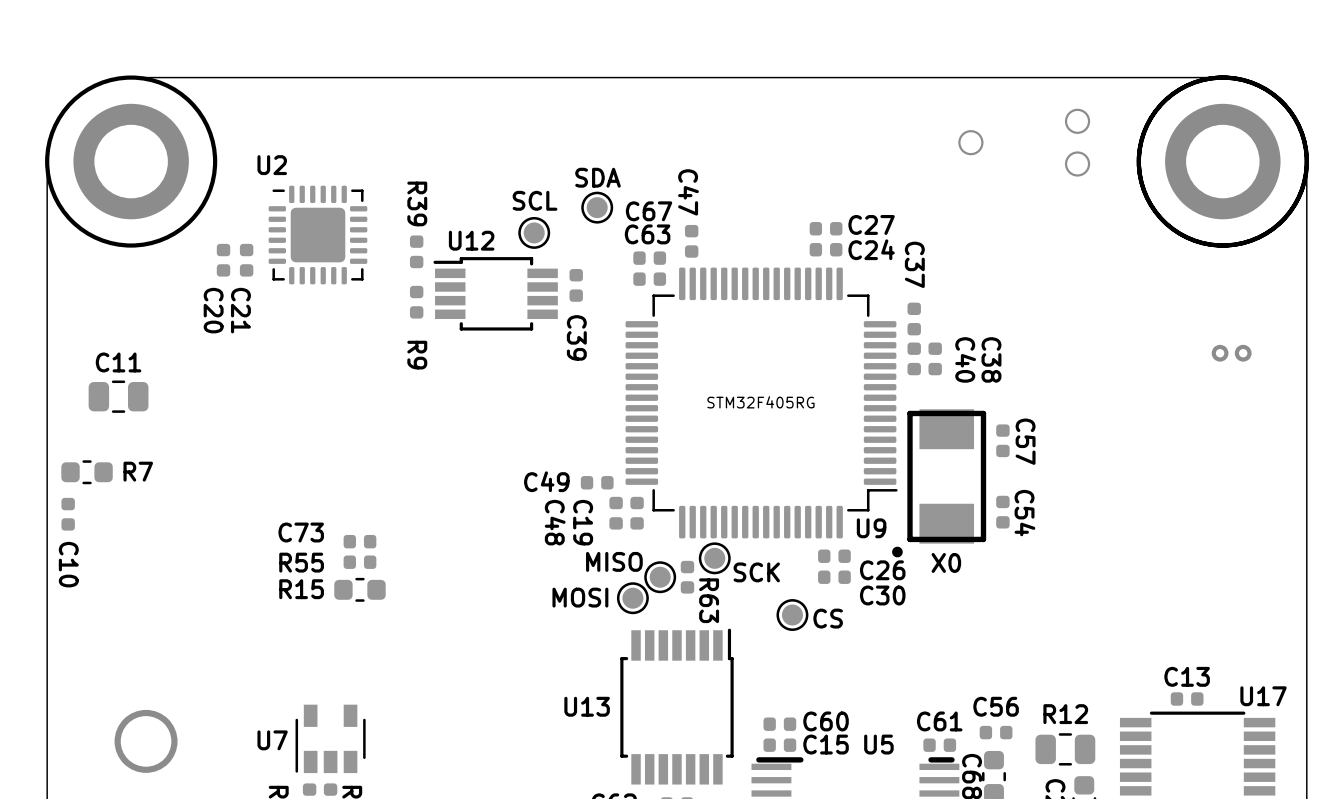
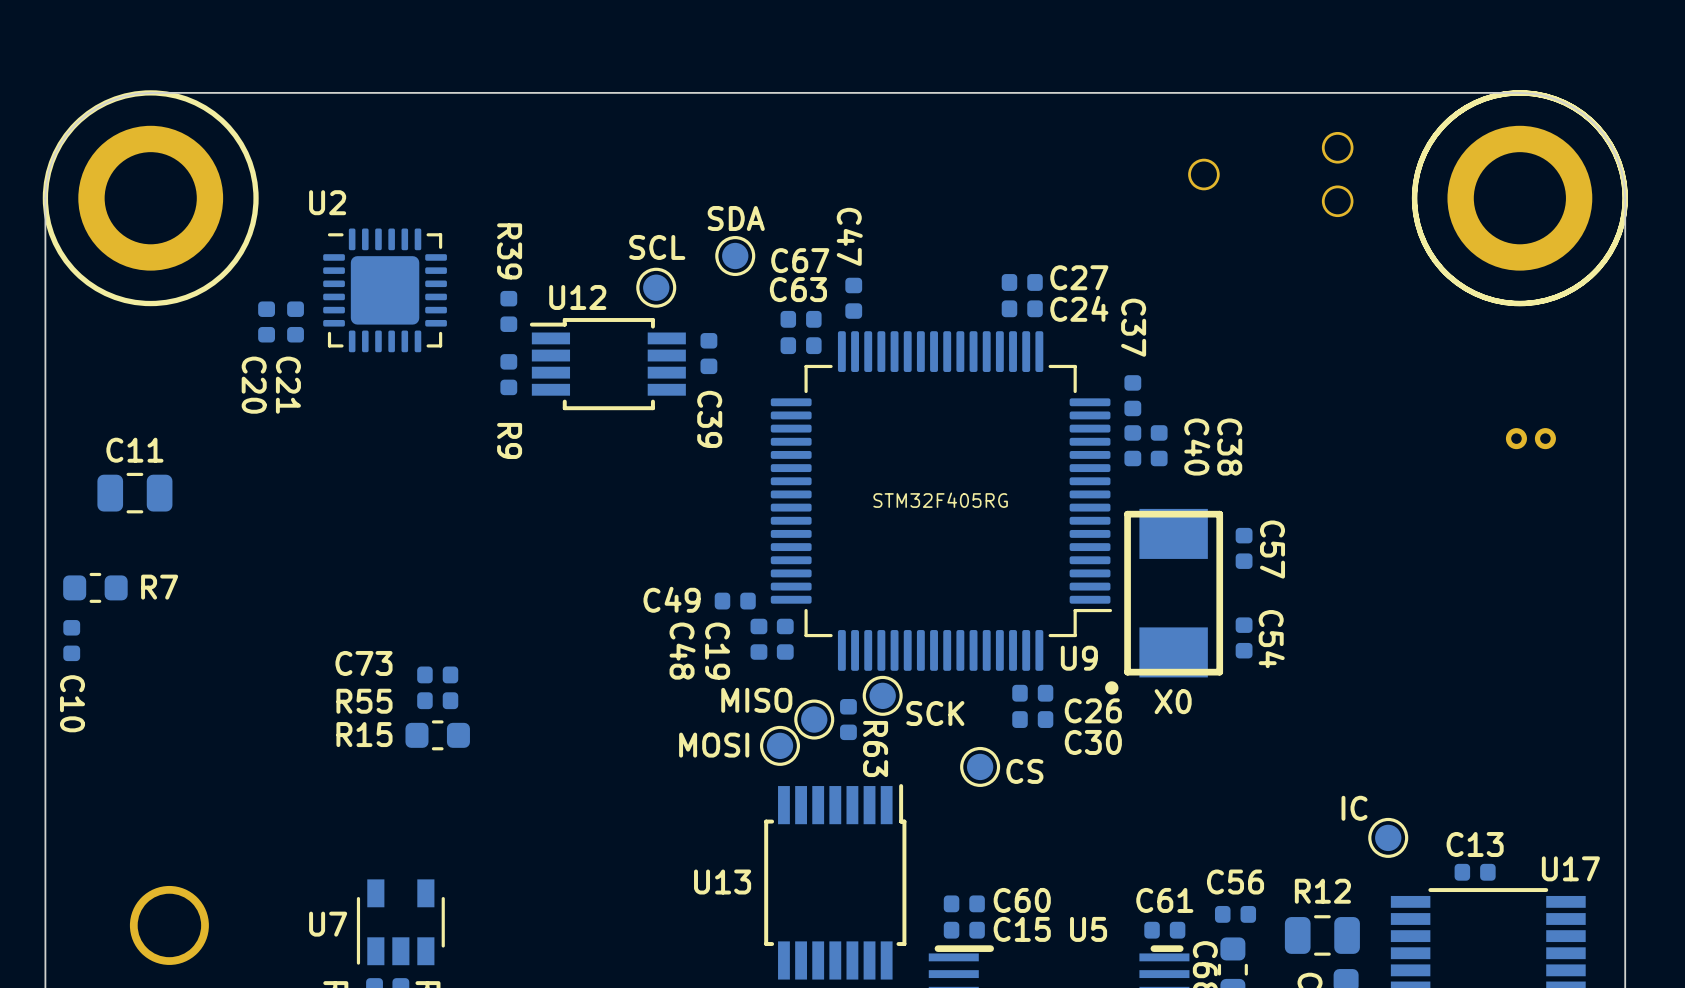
text: none -> IC (1354, 808)
part: none -> (1388, 837)

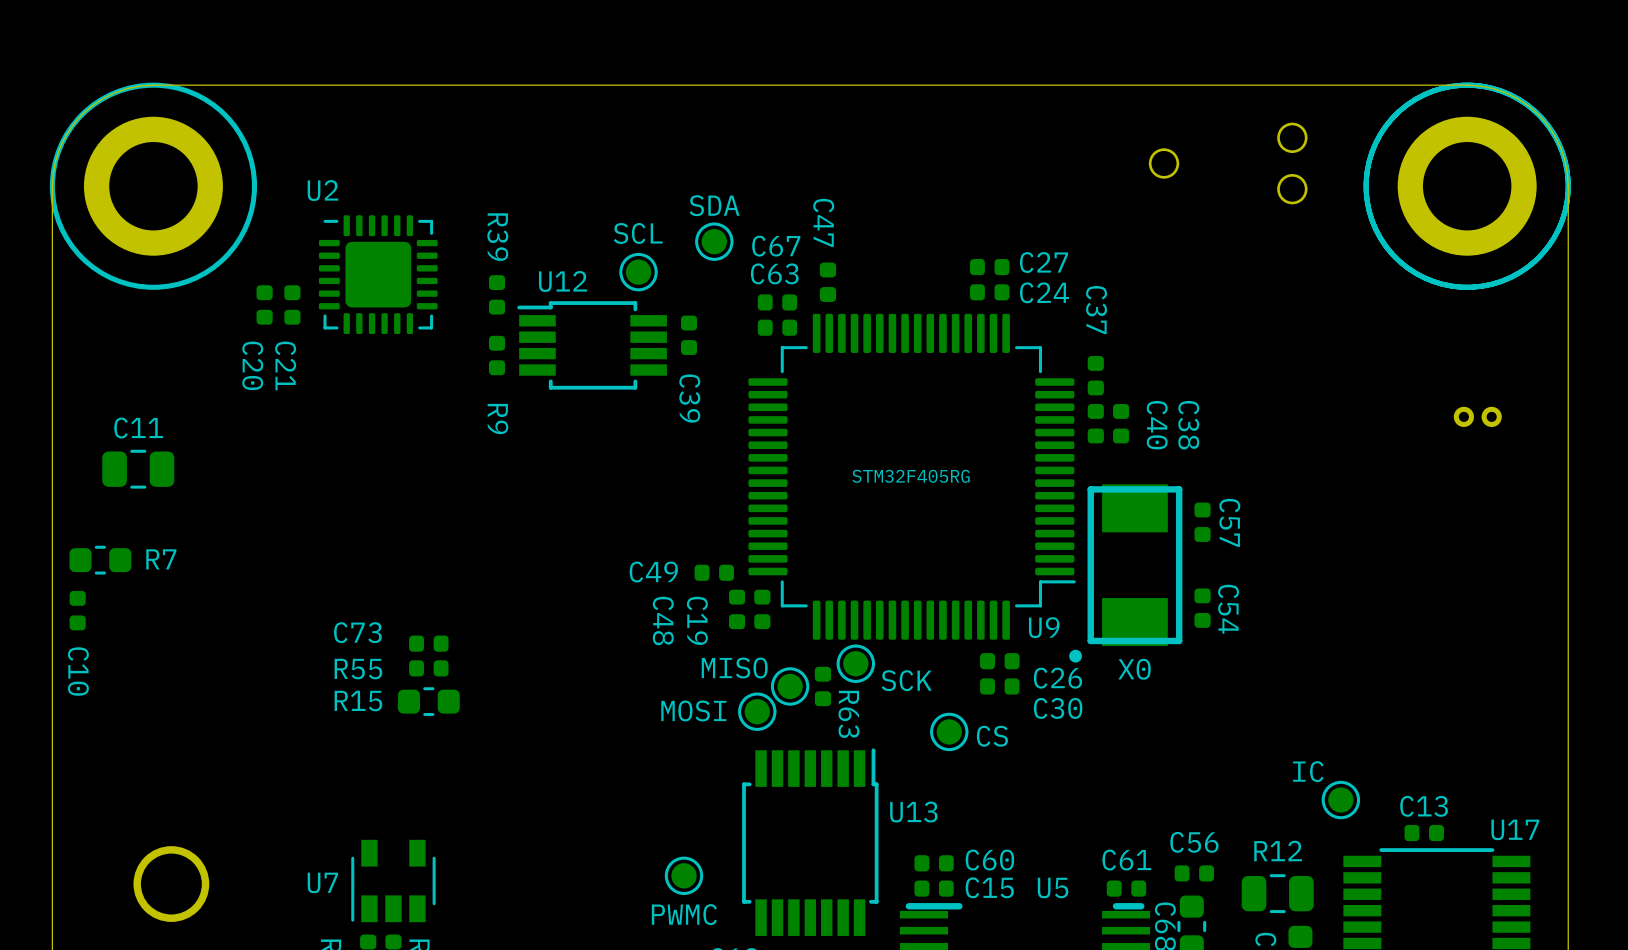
U13 name position: U13 (722, 882) -> U13 (913, 812)
part: none -> (683, 875)
text: none -> PWMC (684, 914)

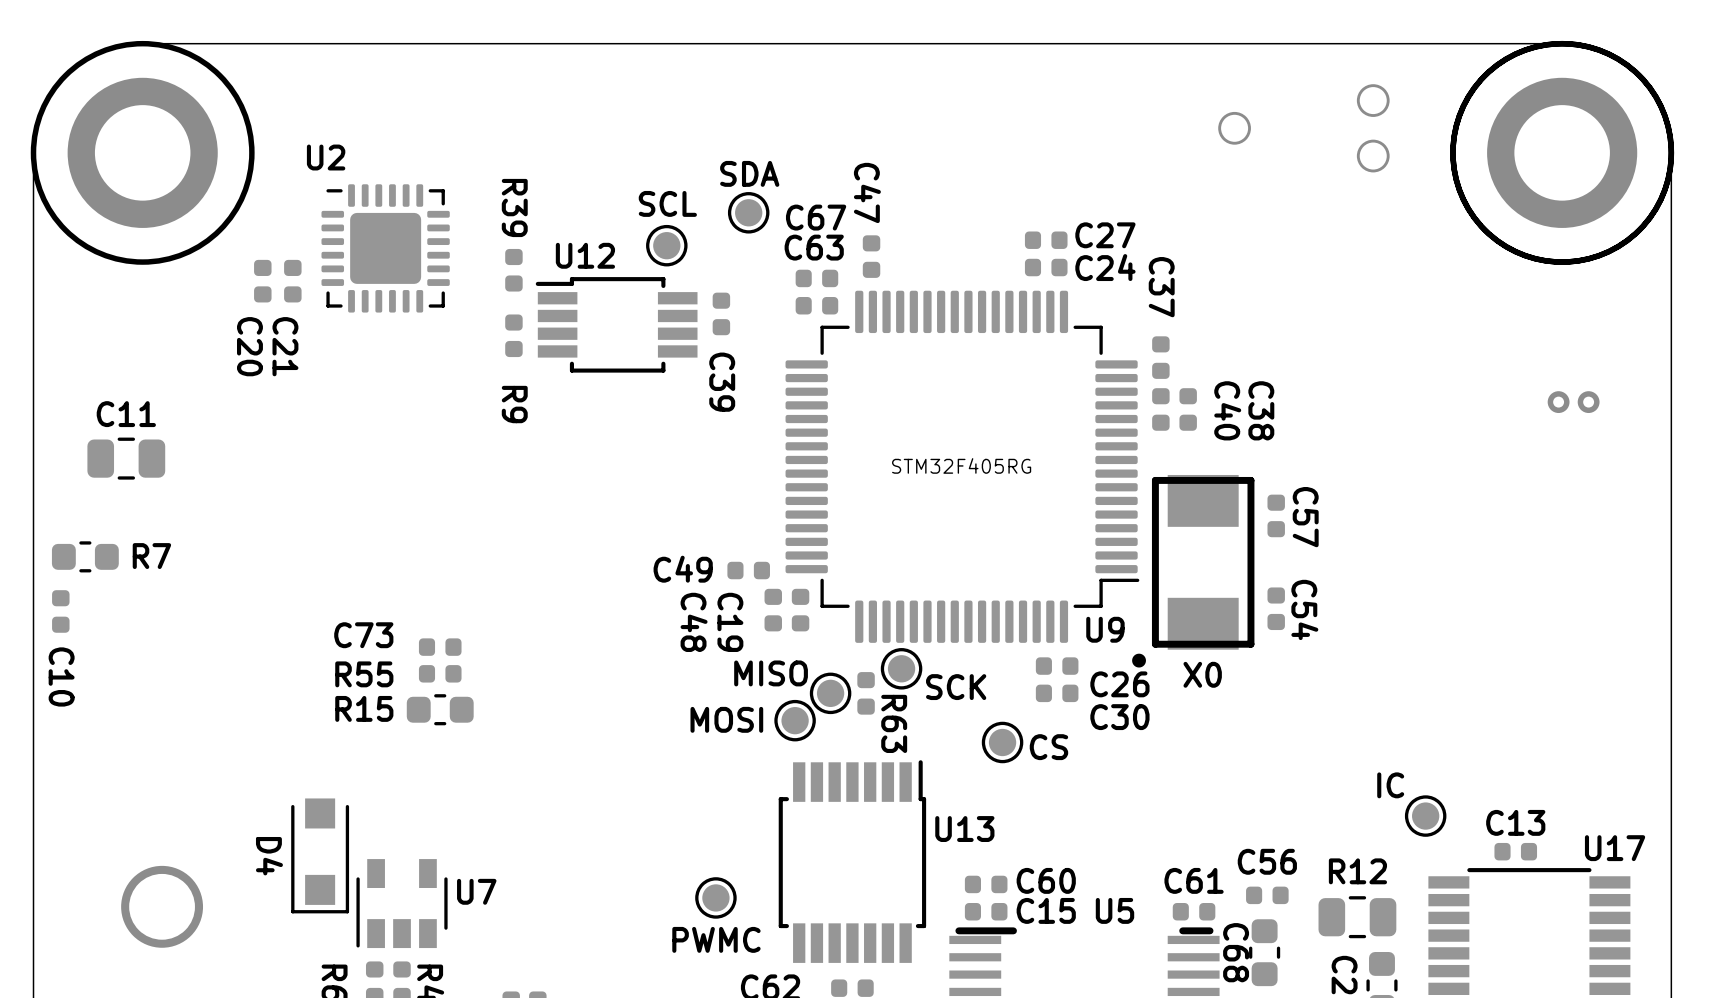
D4: none -> (320, 855)
U7 name position: U7 (322, 882) -> U7 (476, 891)

